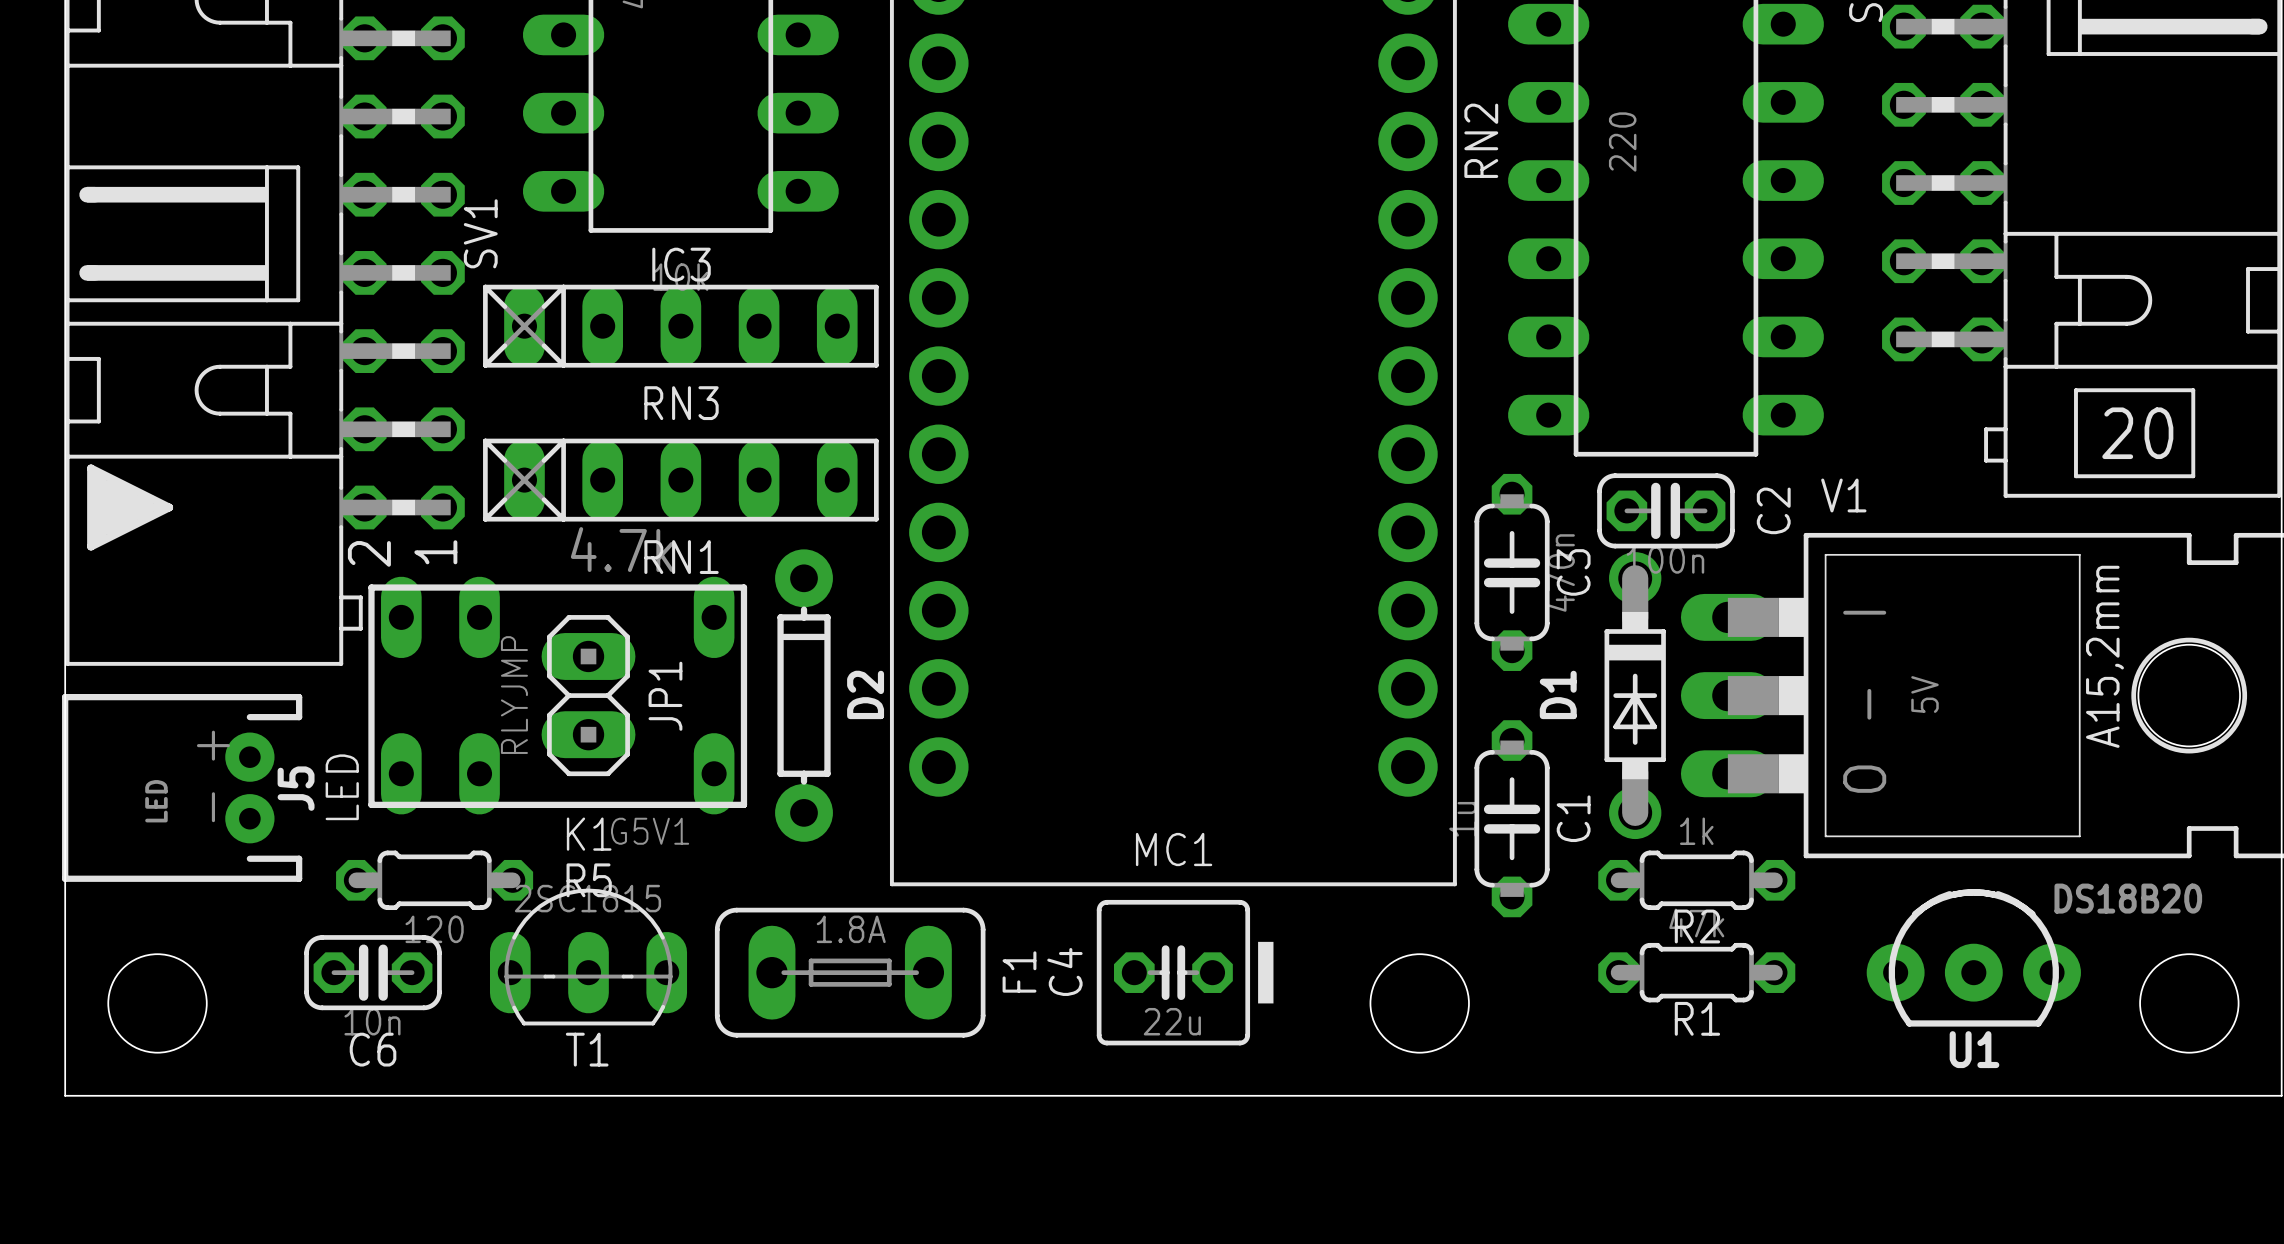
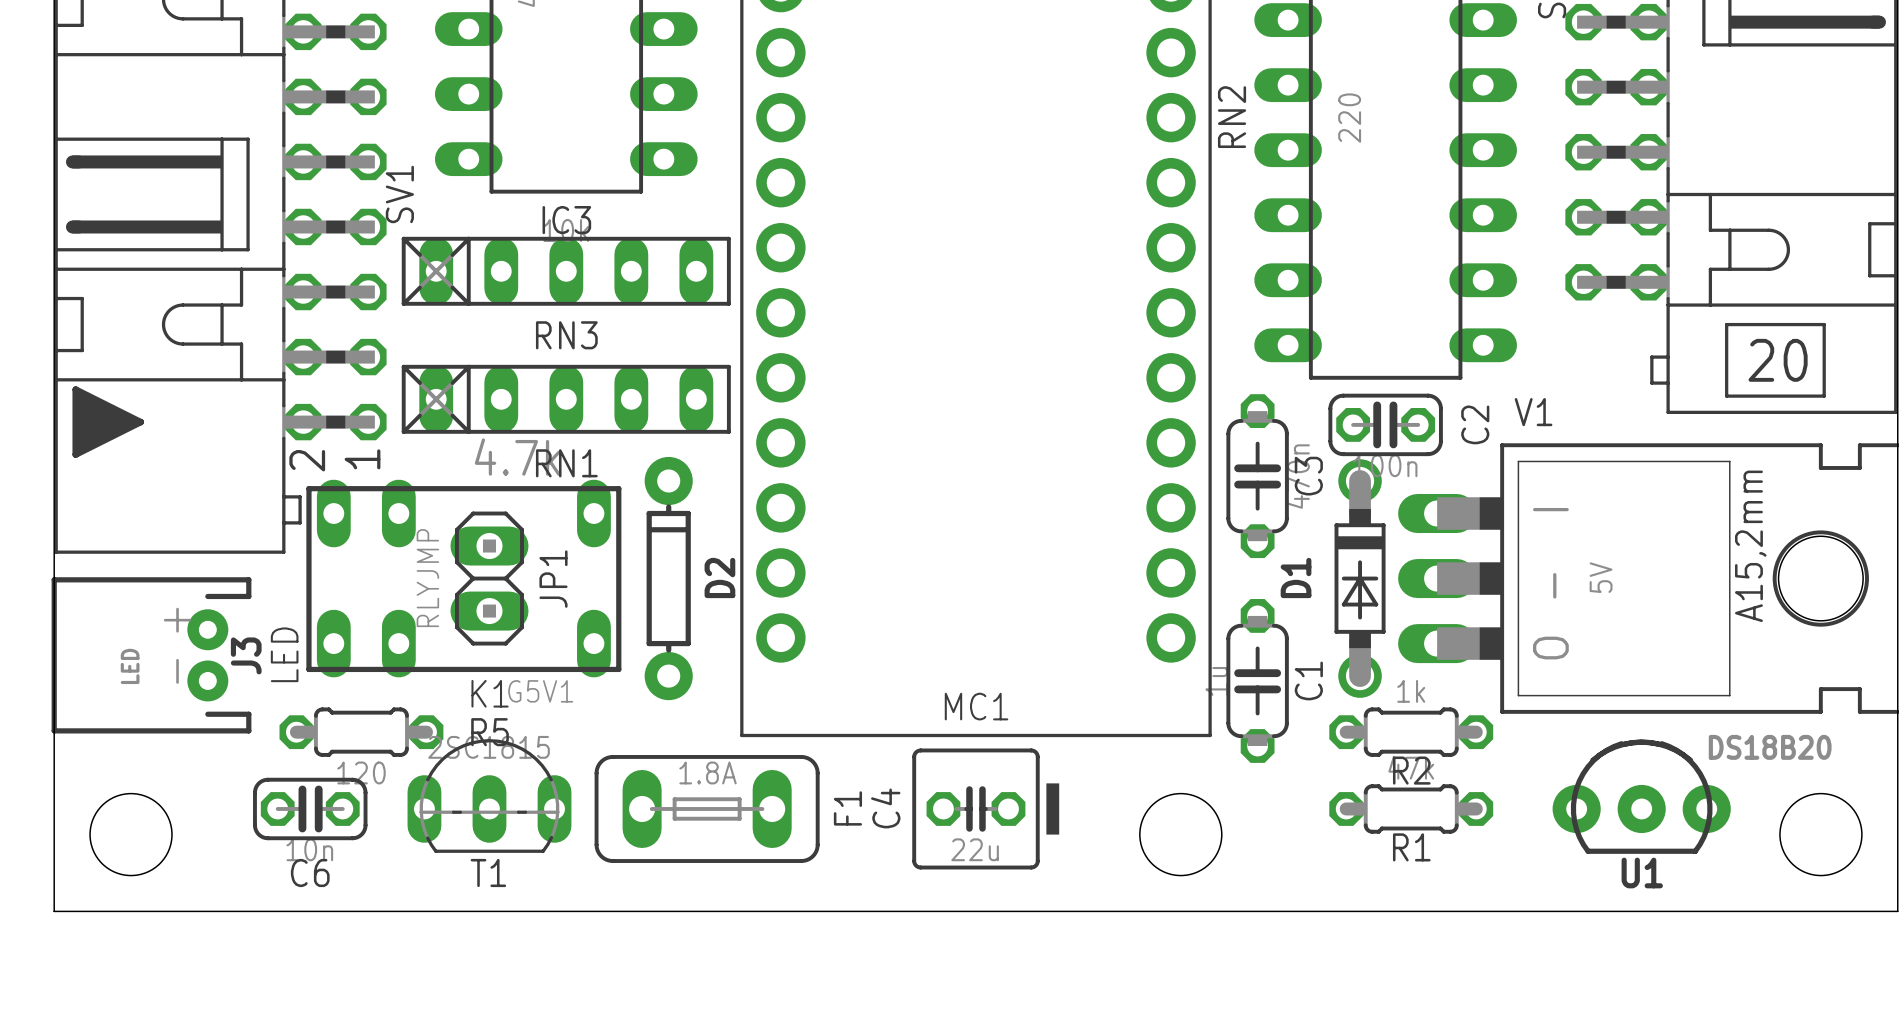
J5 name: J5 (296, 788) -> J3 (246, 655)

